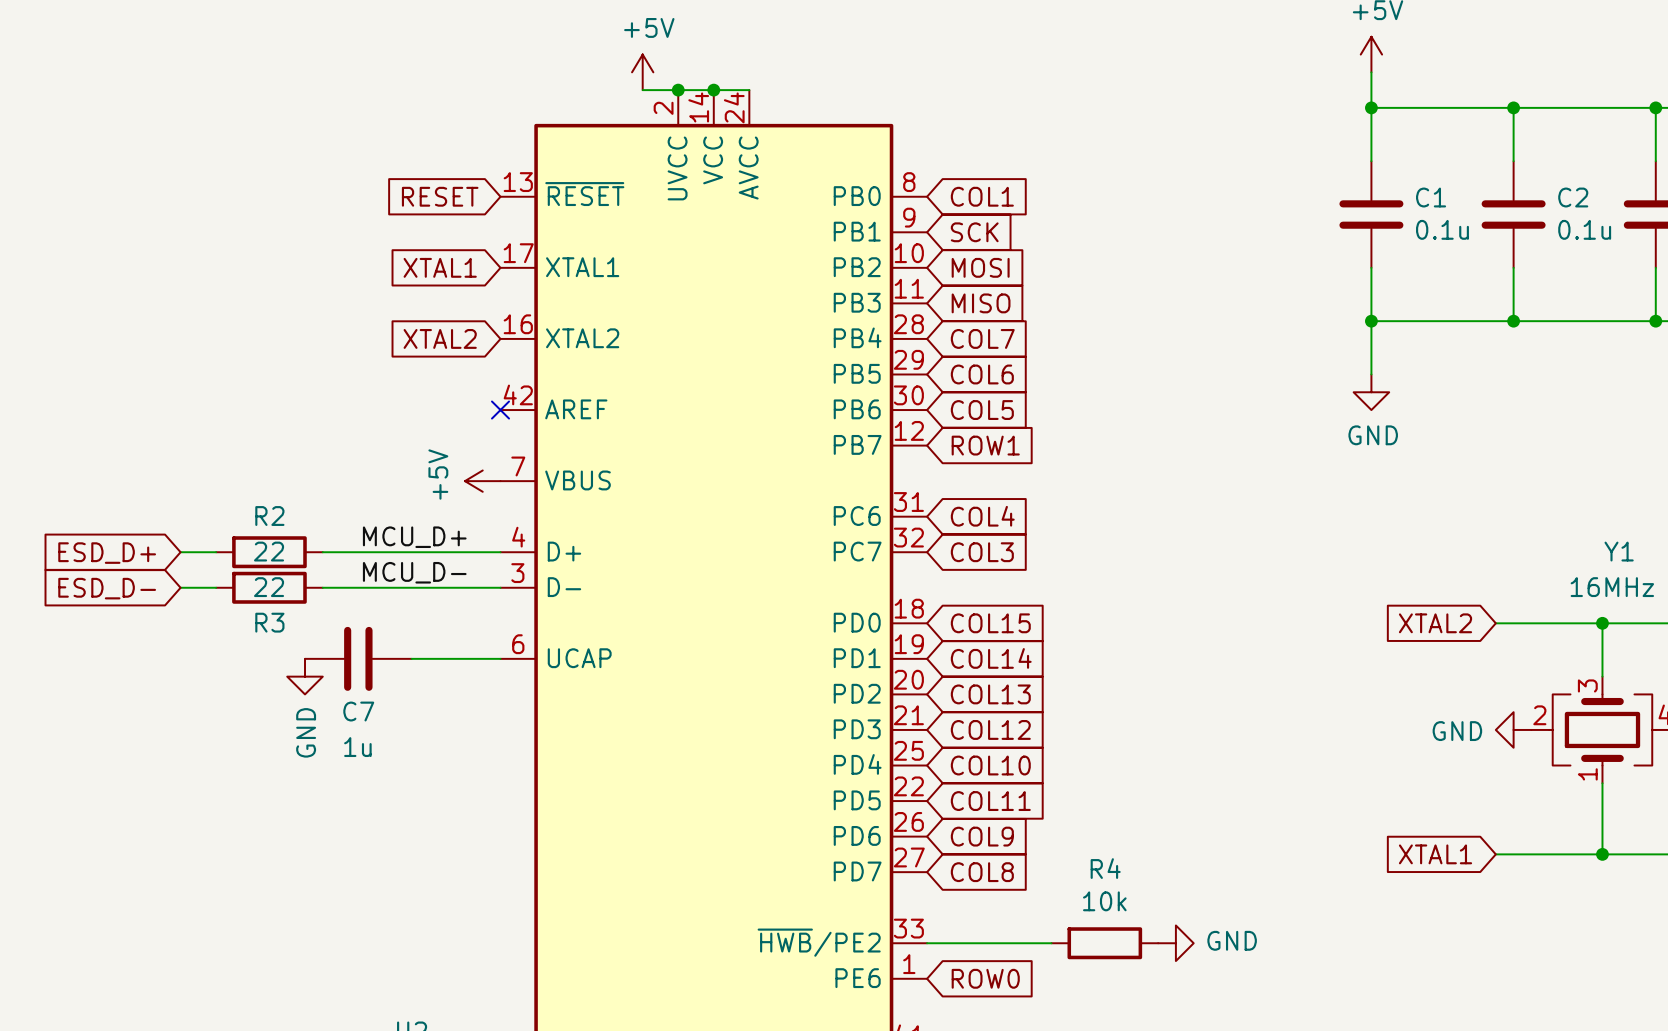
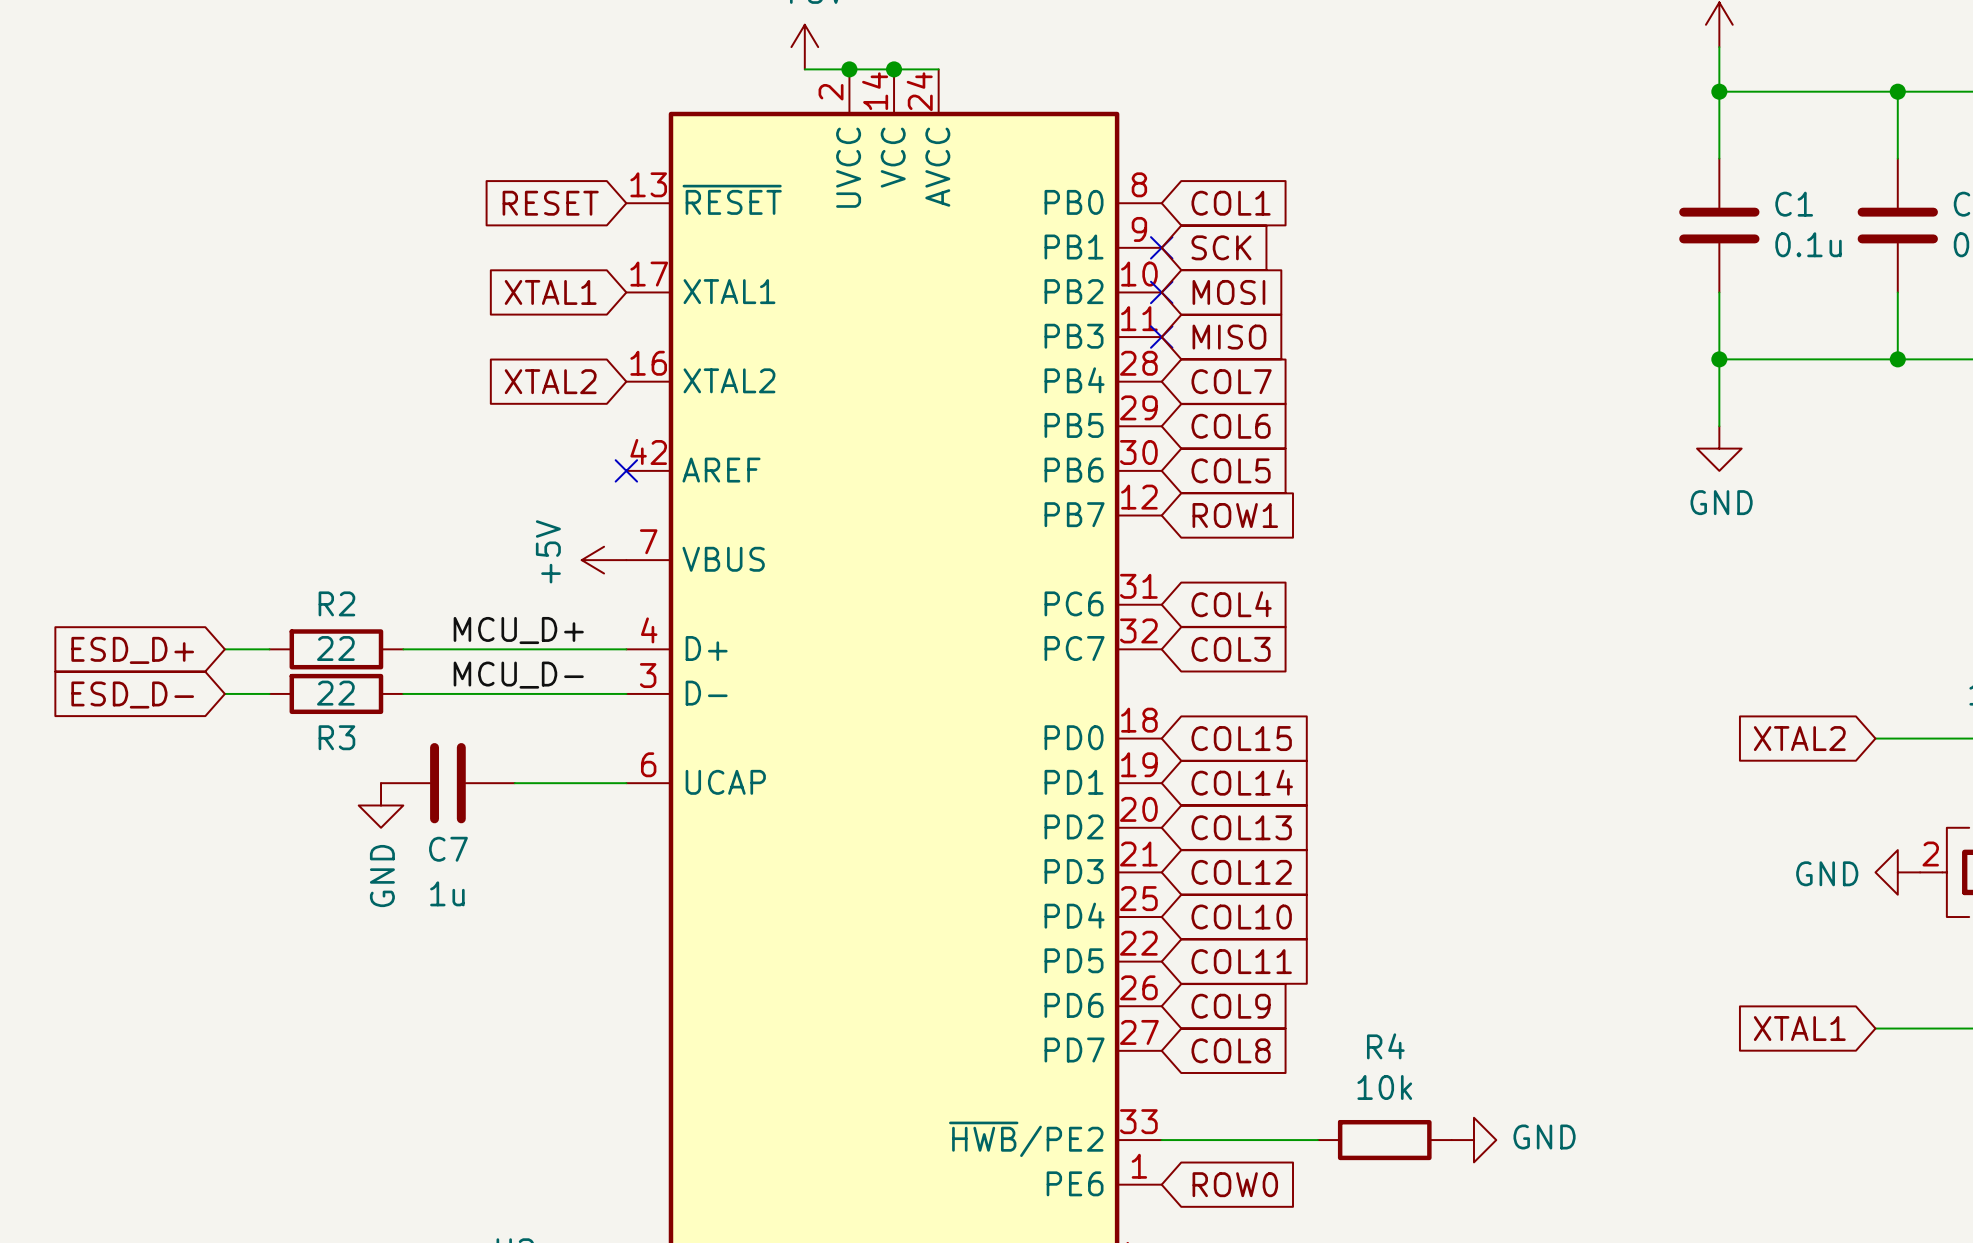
no-connect mark: none -> (1161, 247)
no-connect mark: none -> (1161, 292)
no-connect mark: none -> (1161, 337)

